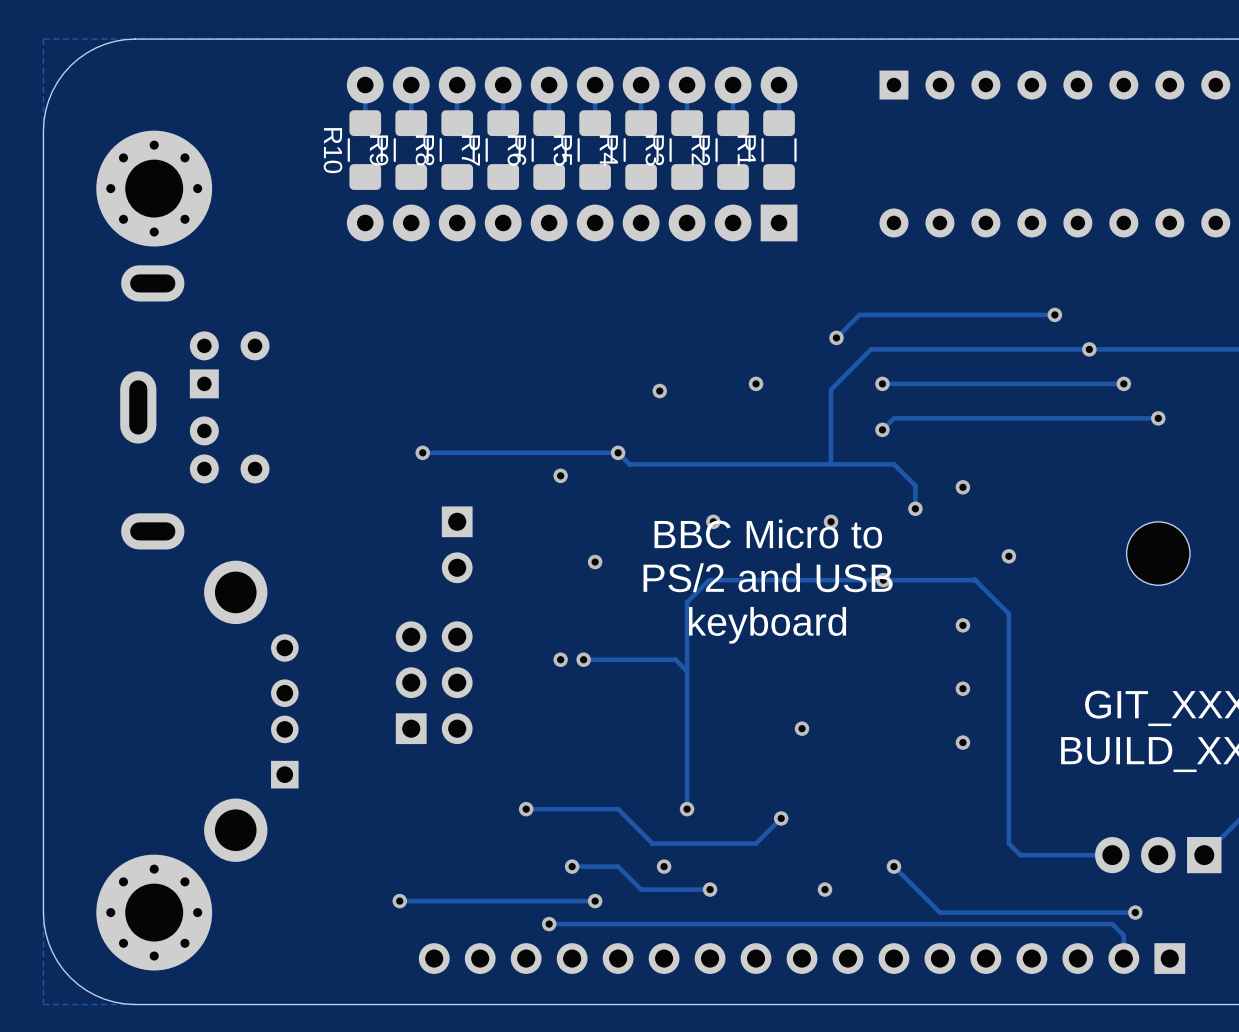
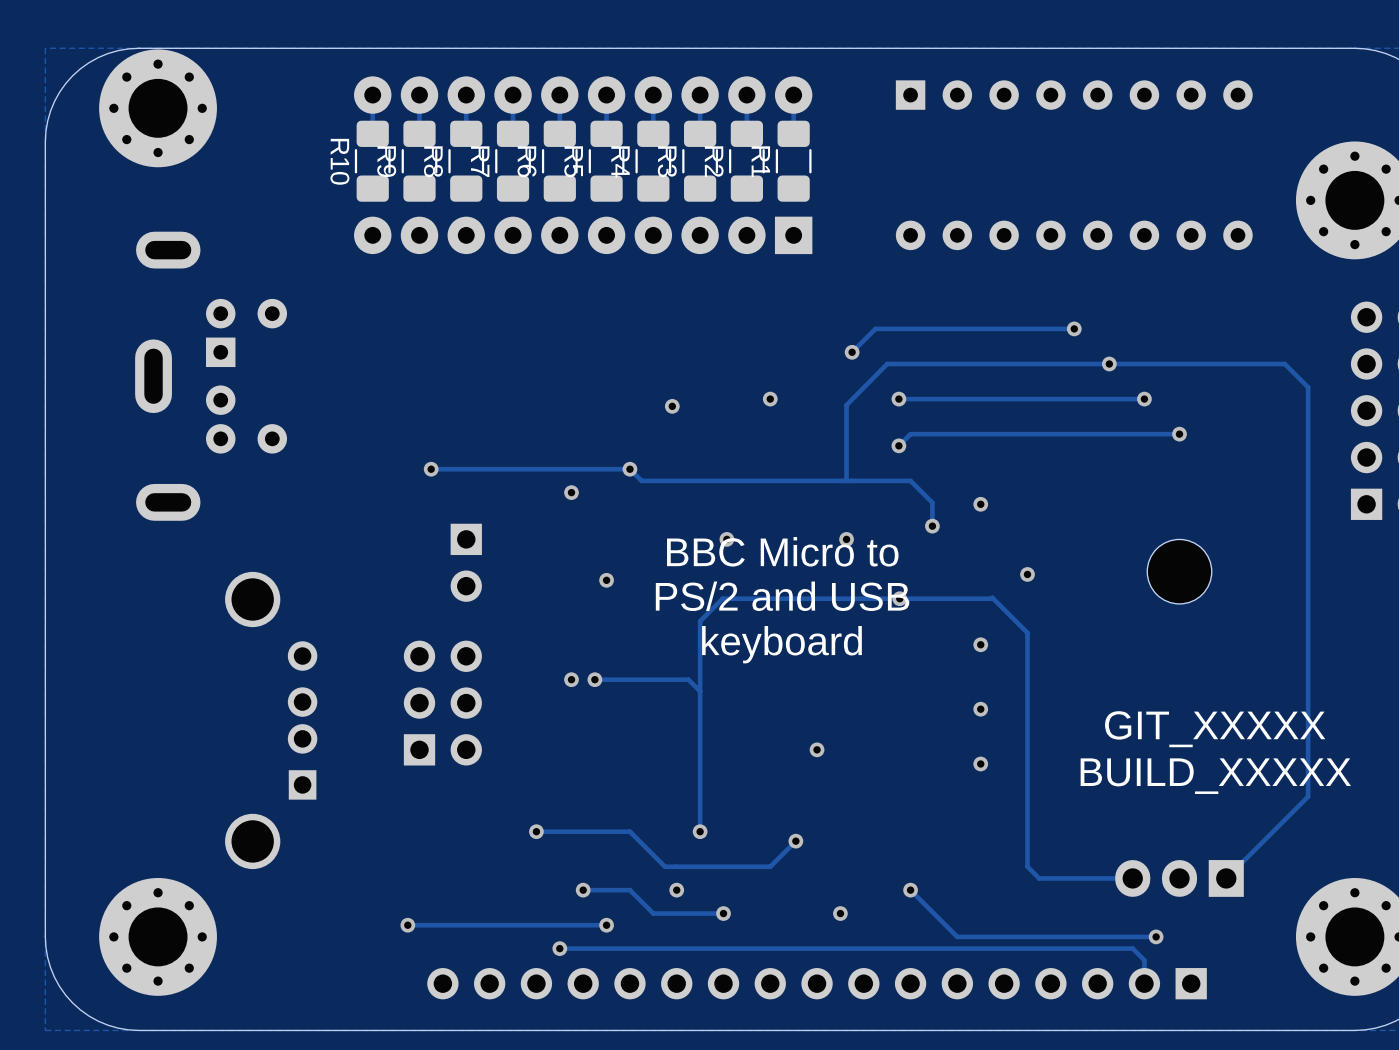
part position: (154, 188) -> (158, 108)
part position: (194, 407) -> (211, 376)
part: none -> (271, 720)
part: (251, 711) -> none

